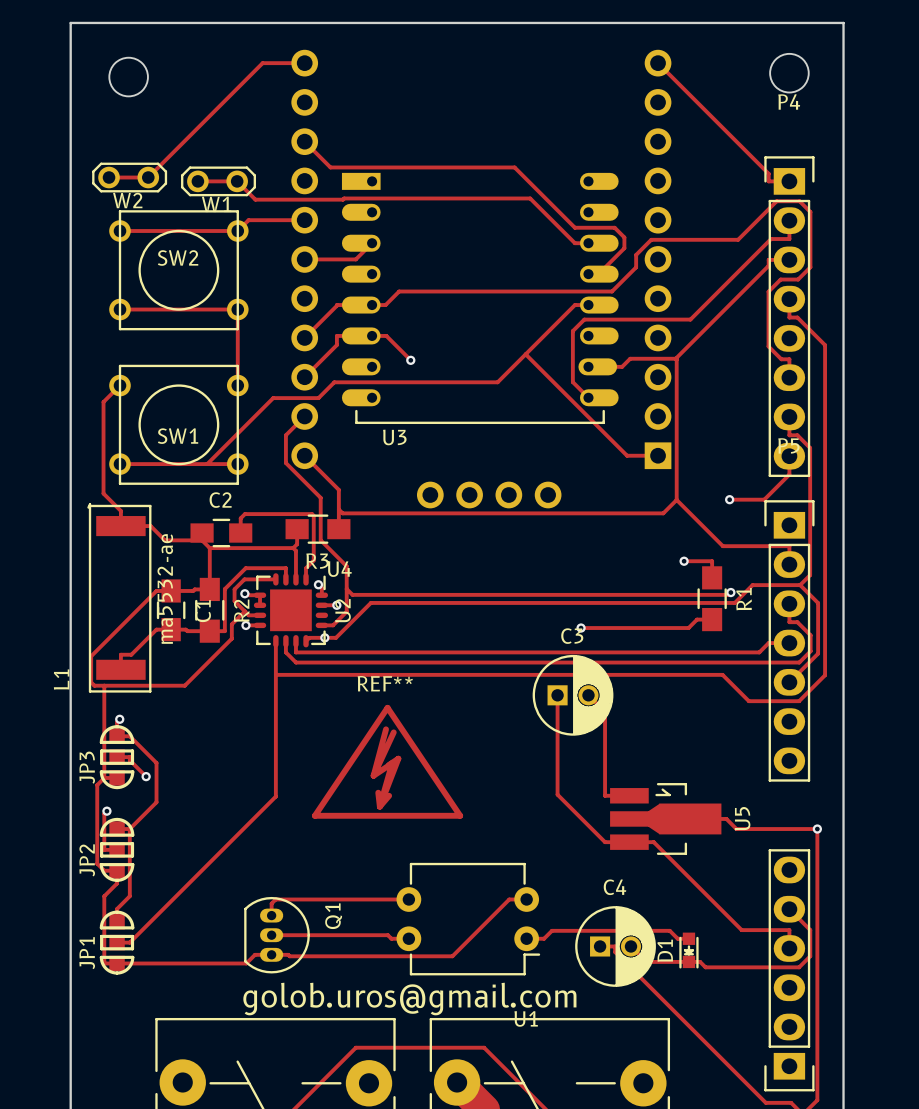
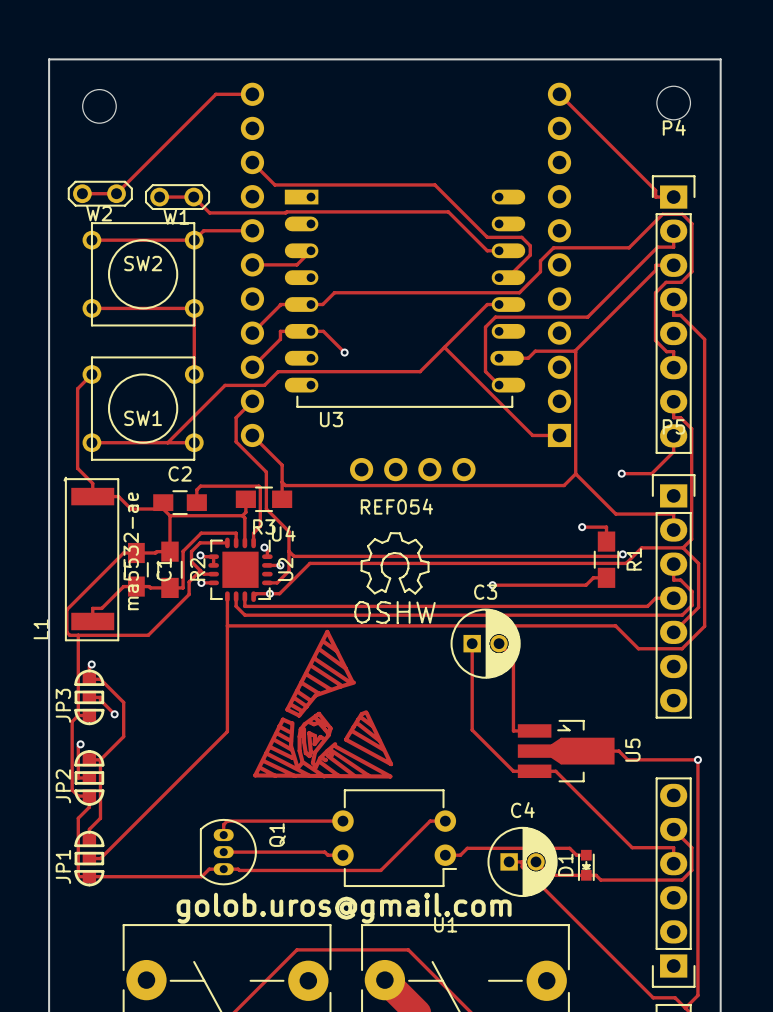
REF054: none -> (394, 578)
drawing: none -> [253, 629, 394, 779]
REF**: (387, 761) -> none

